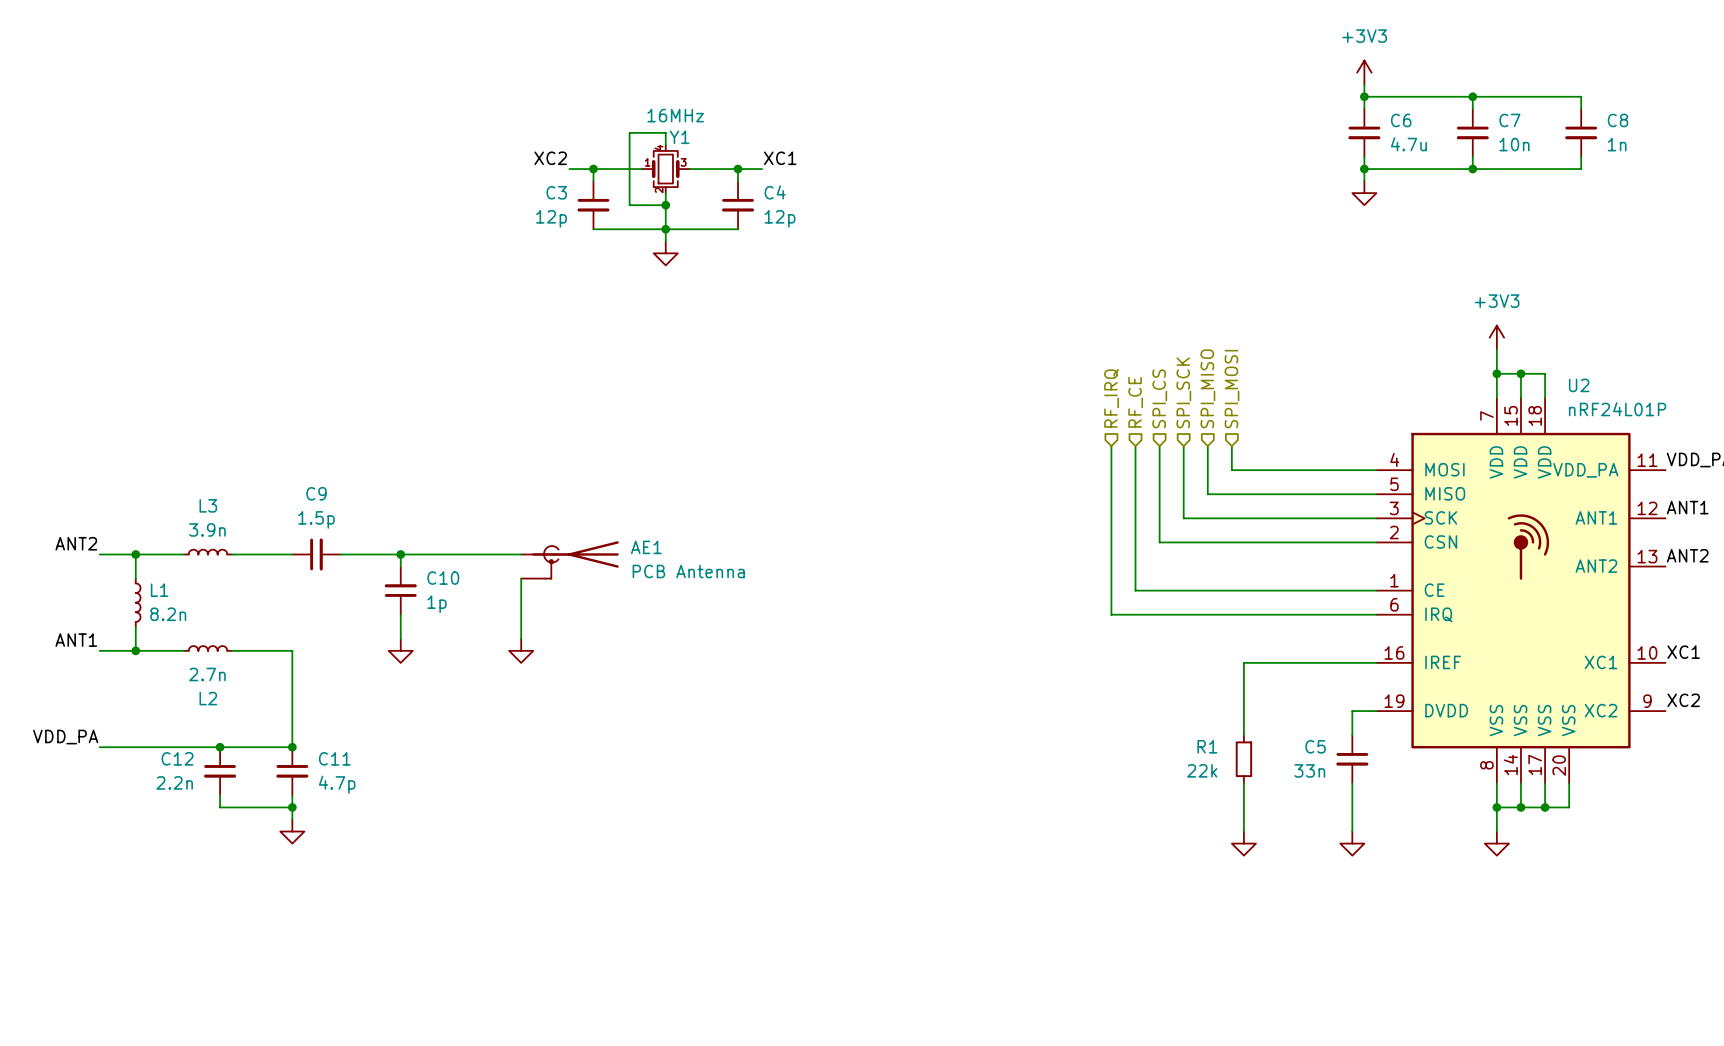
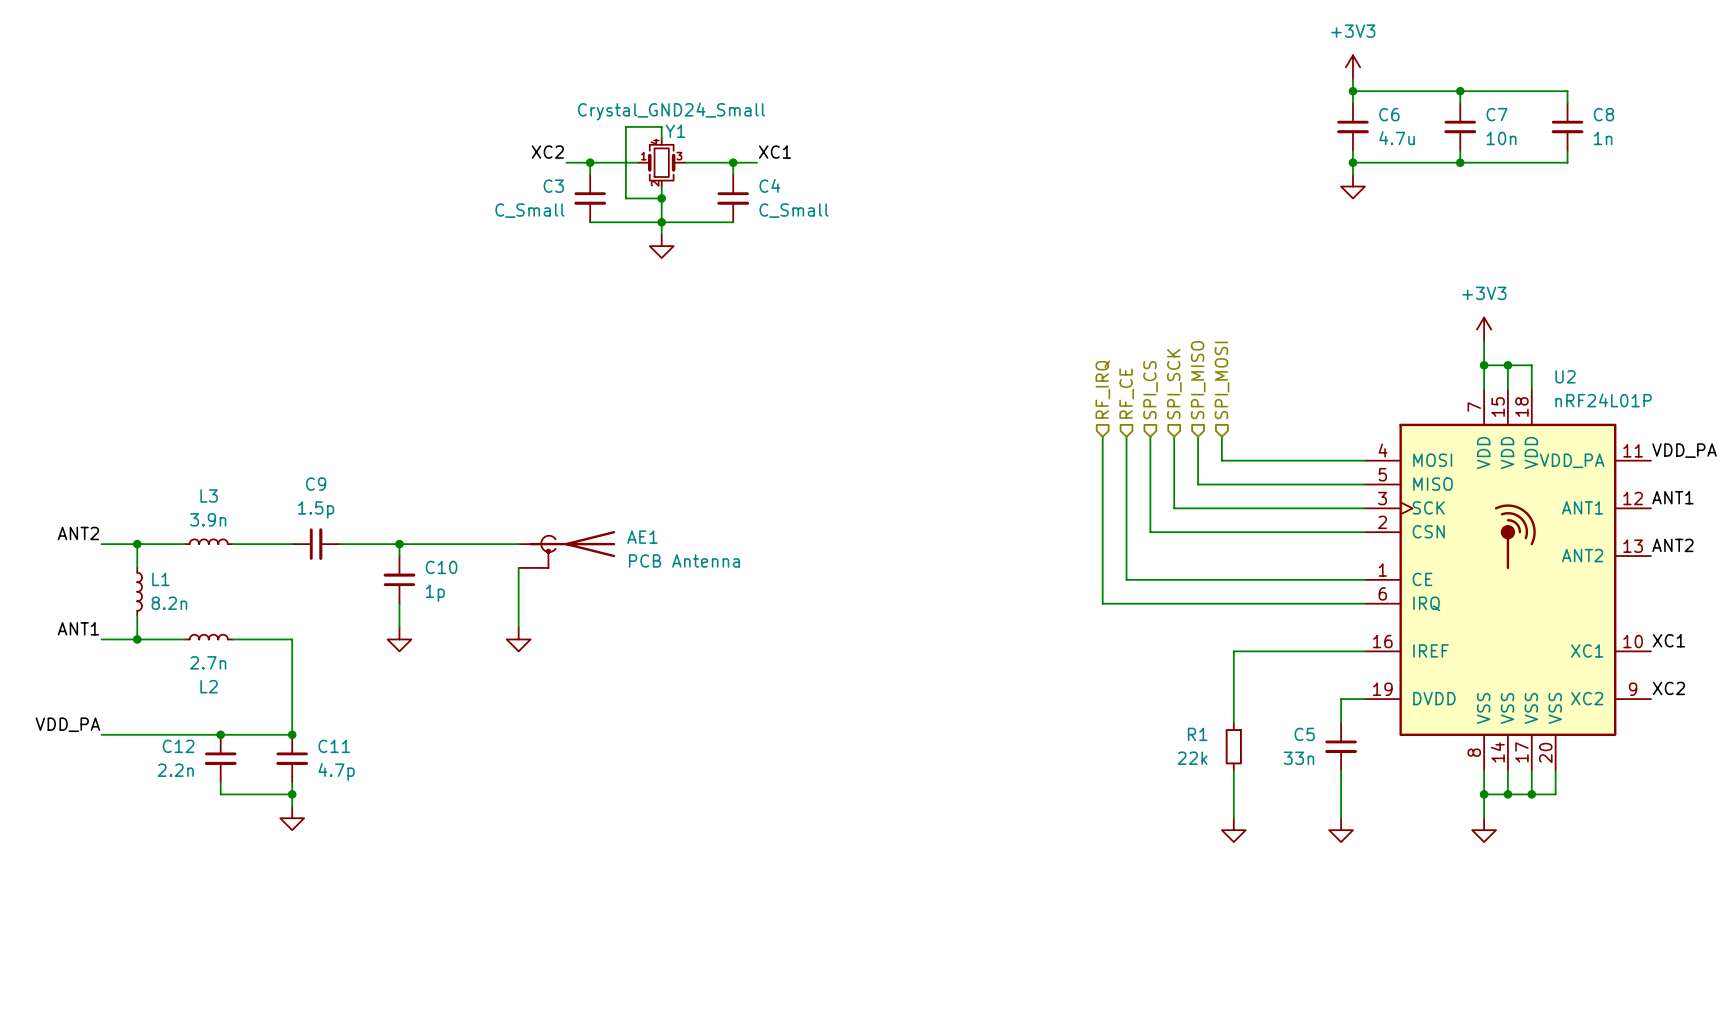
Y1 value: 16MHz (675, 115) -> Crystal_GND24_Small (671, 111)
C3 value: 12p (551, 218) -> C_Small (529, 210)
C4 value: 12p (779, 218) -> C_Small (794, 210)

